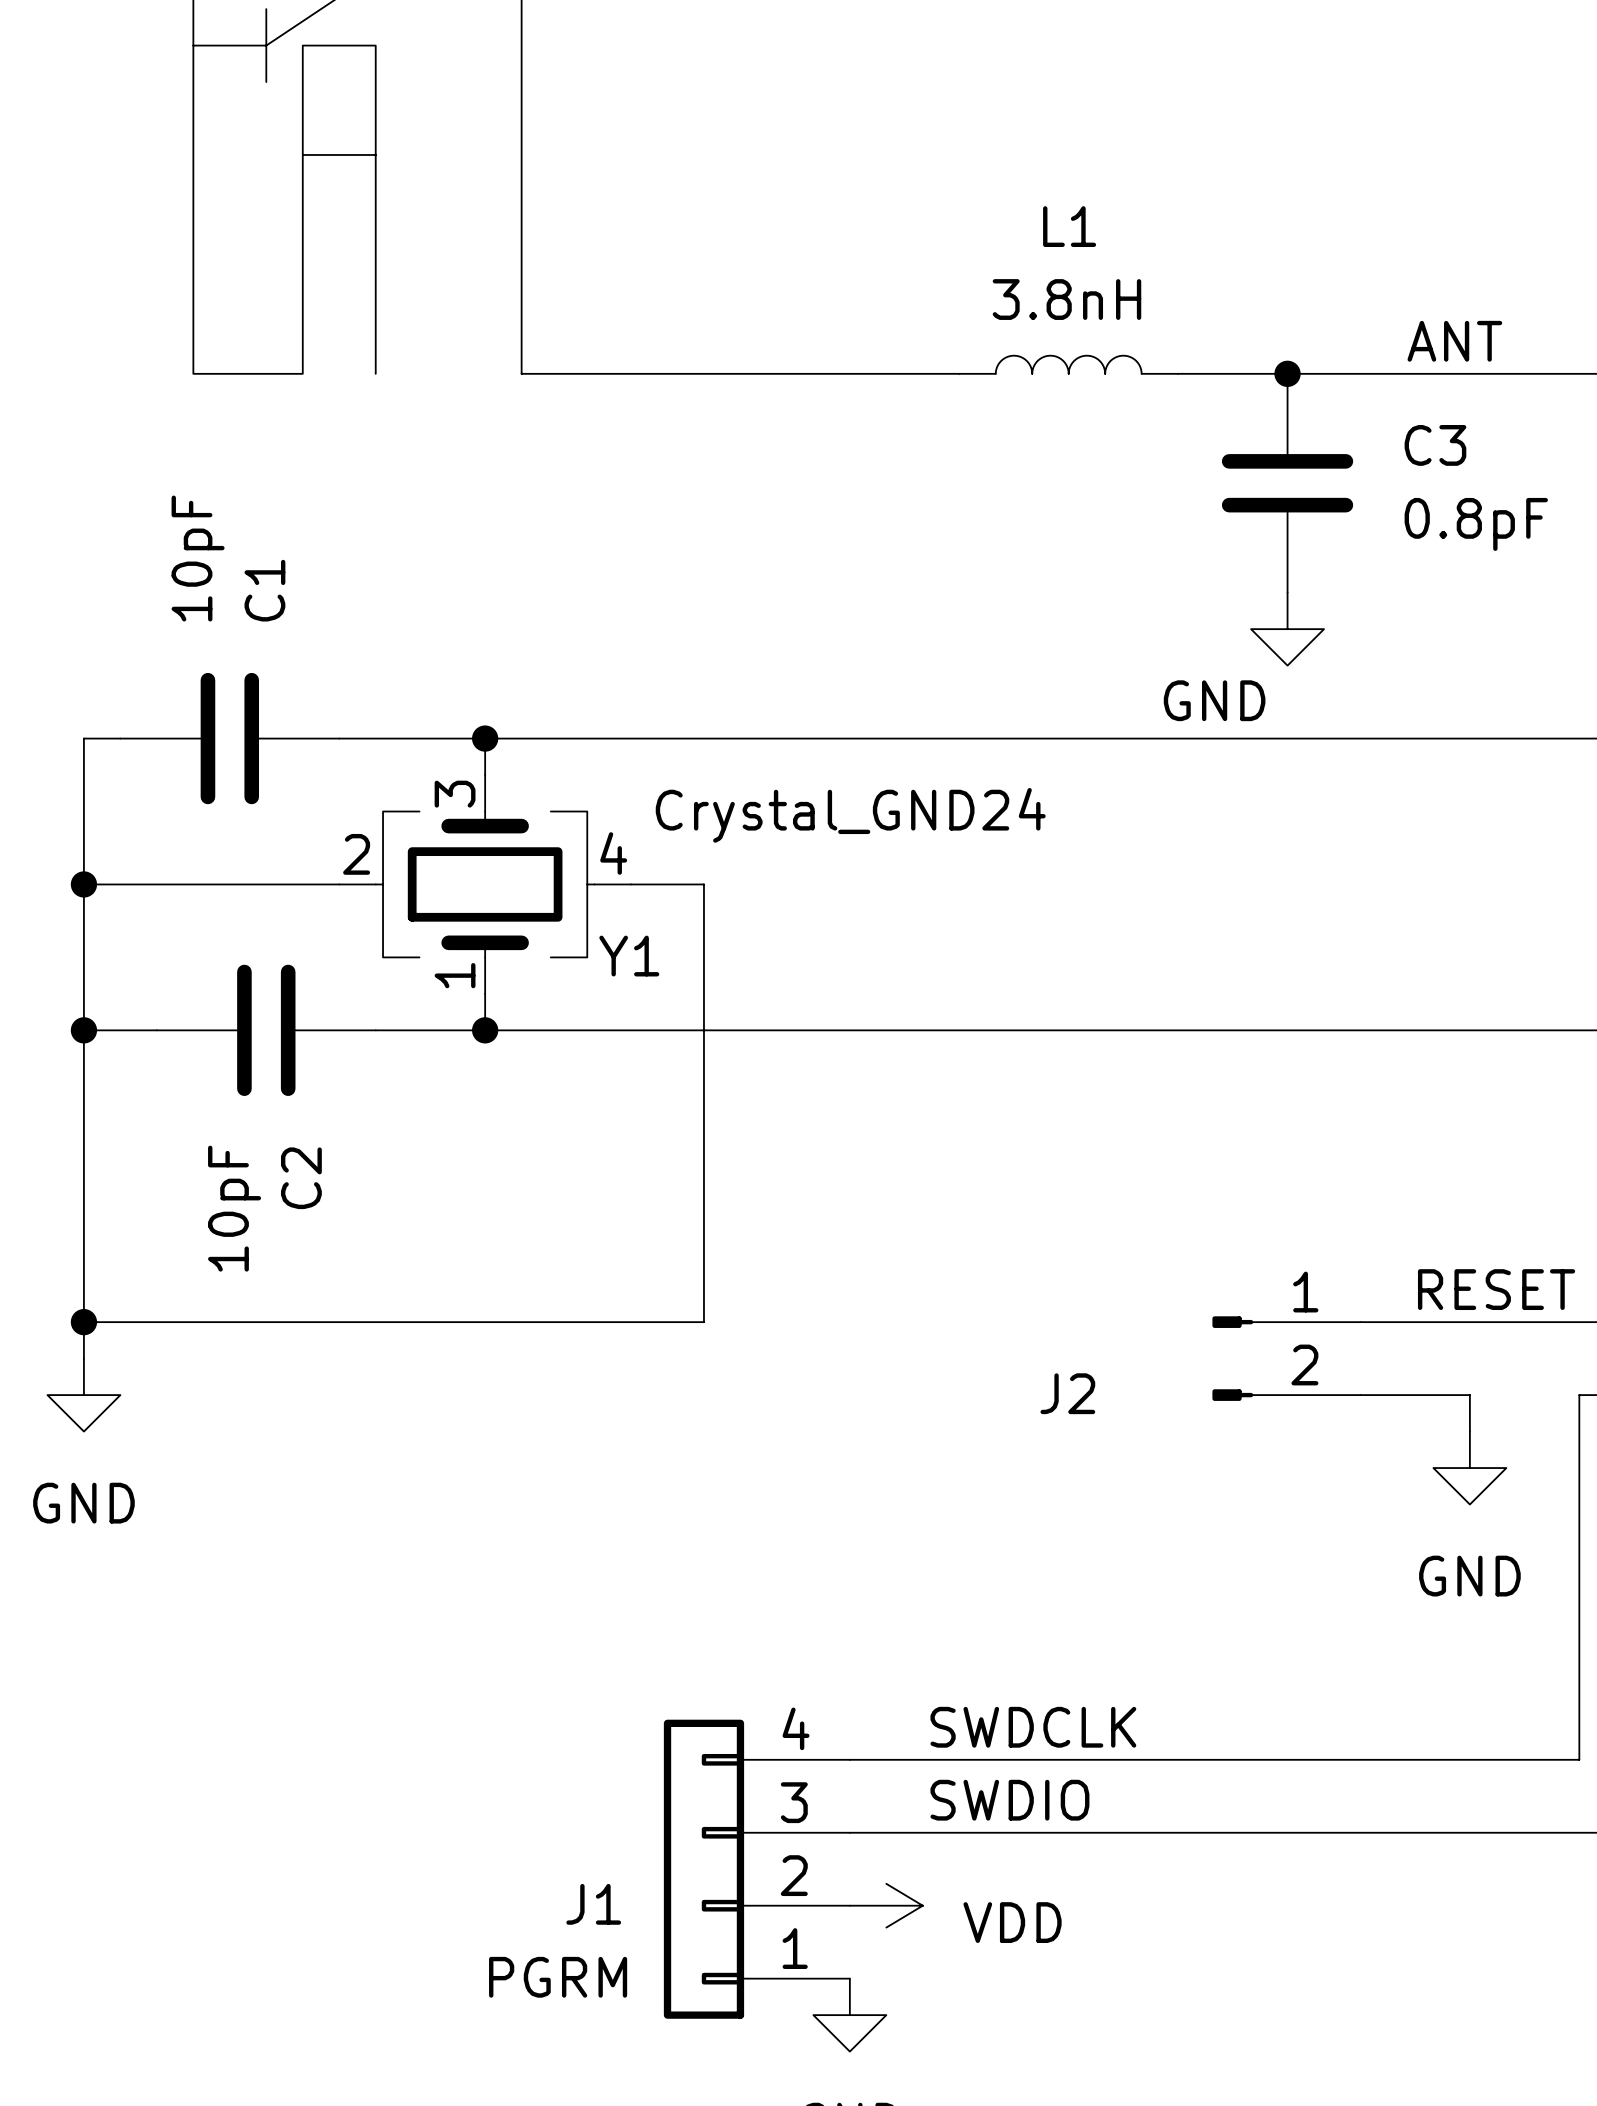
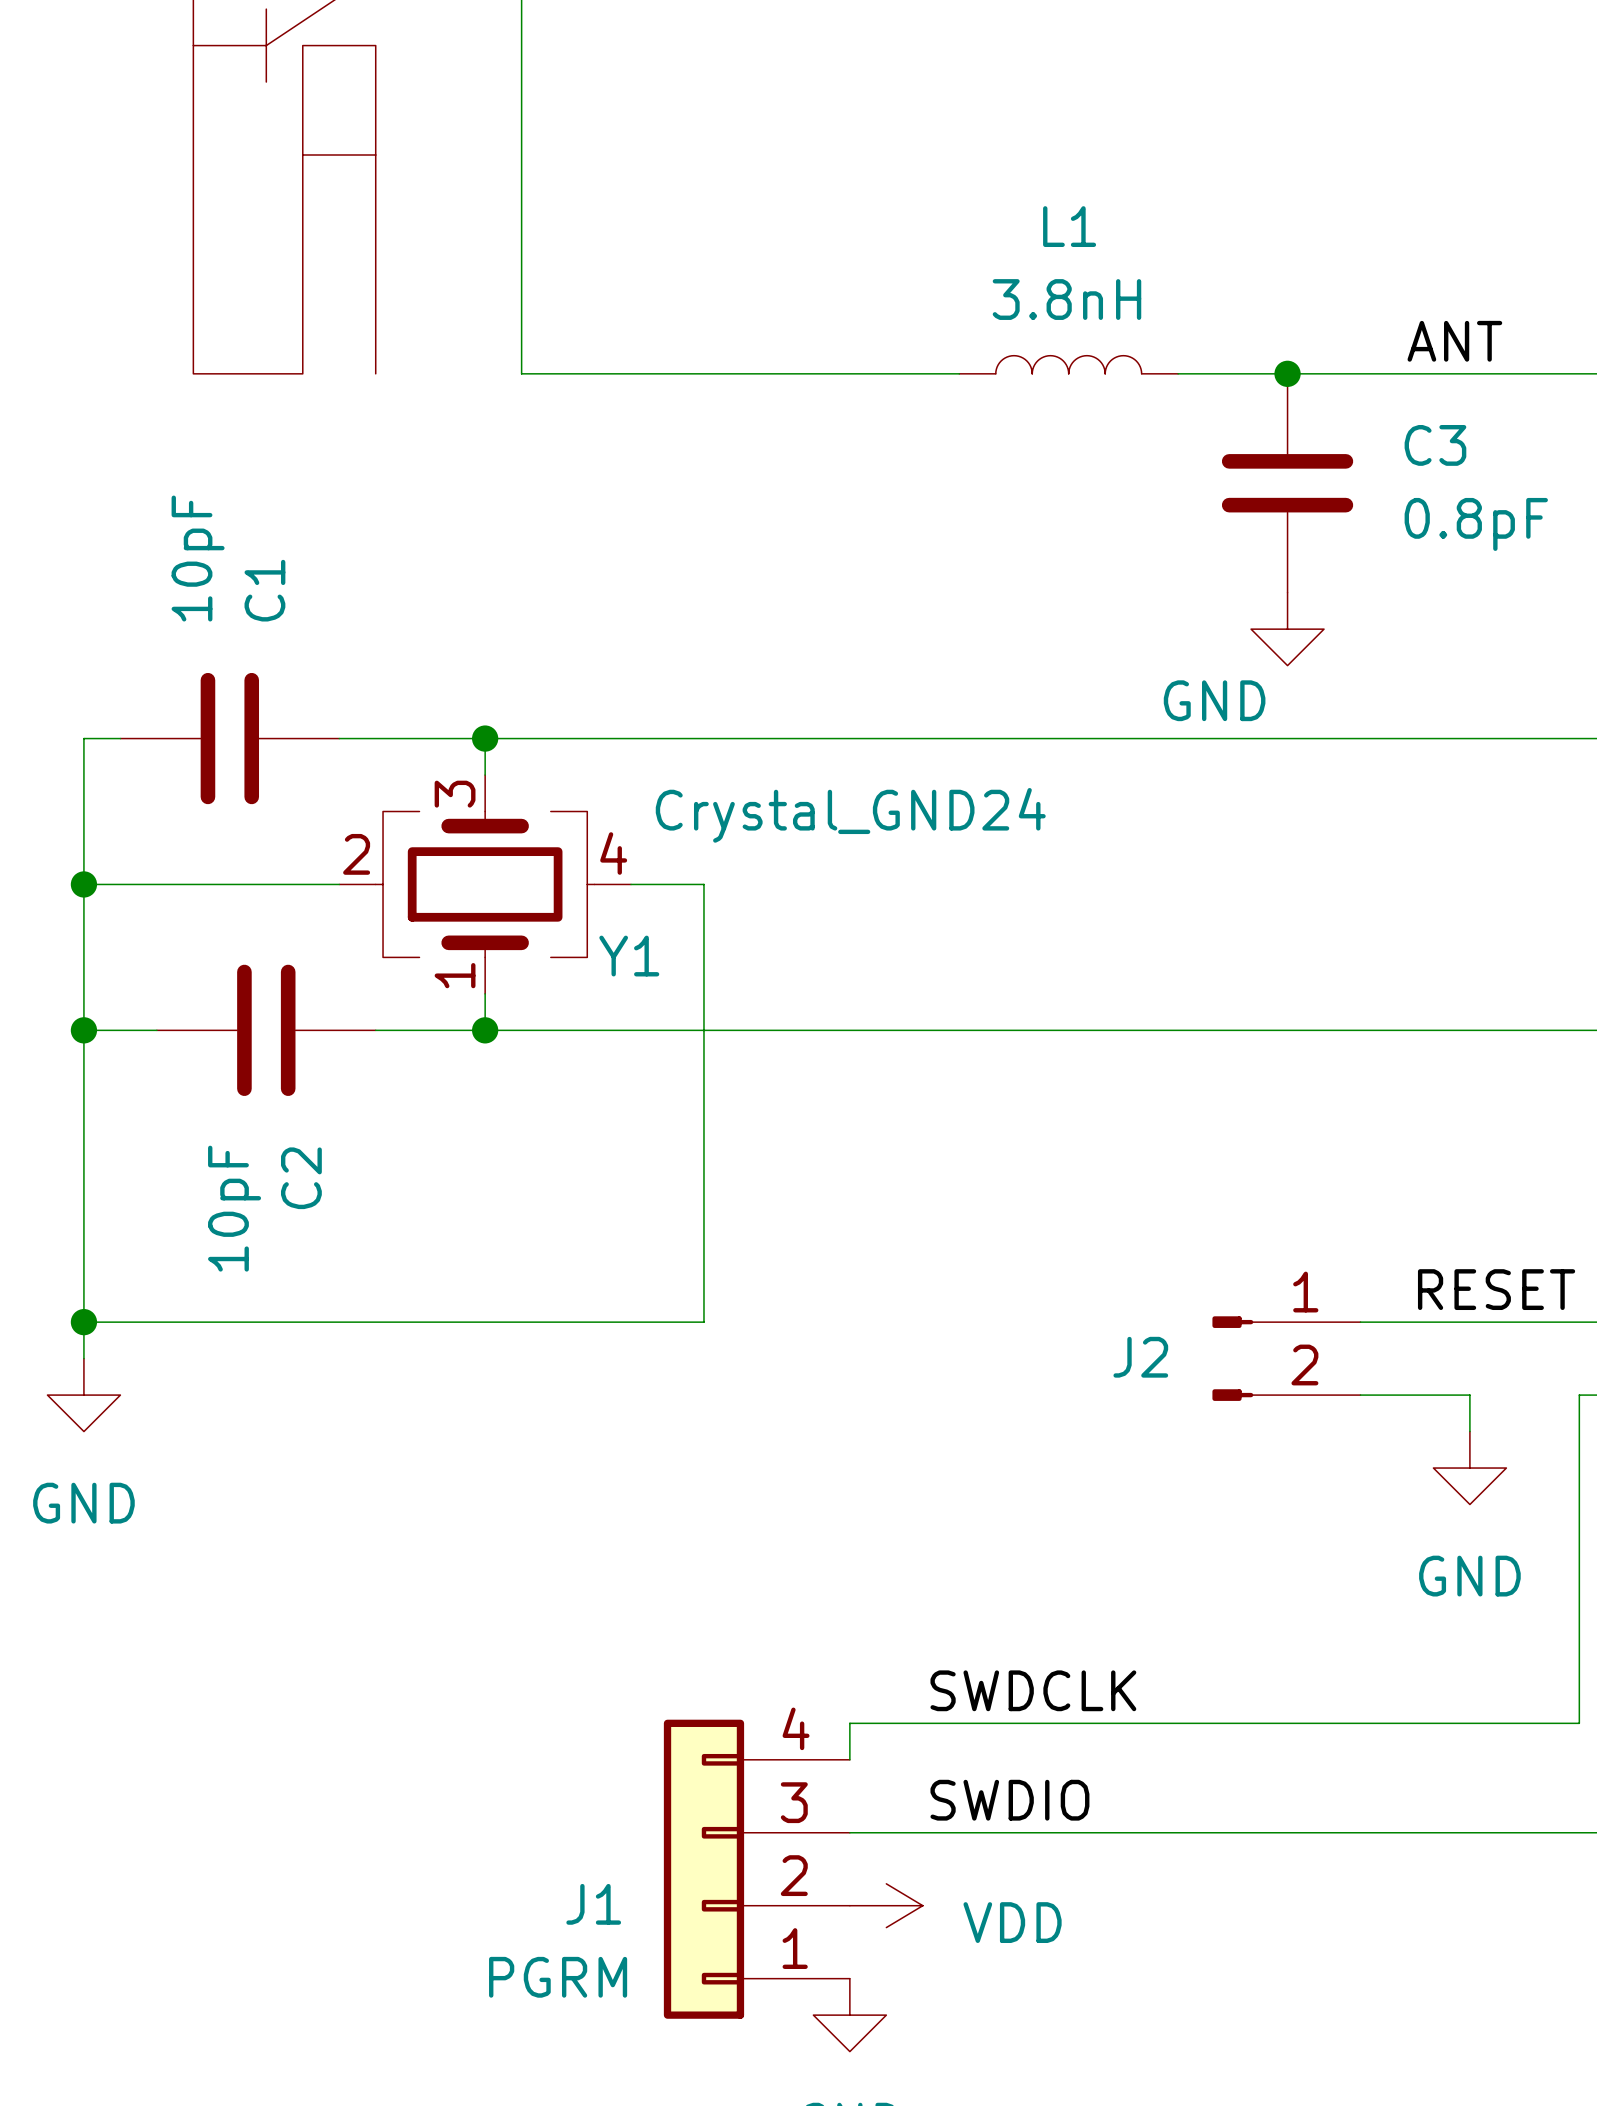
J2 name position: J2 (1067, 1393) -> J2 (1140, 1357)
wire: (1579, 1723) (1579, 1759) (849, 1759) -> (1579, 1723) (849, 1723) (849, 1759)
label position: SWDCLK (1033, 1727) -> SWDCLK (1033, 1690)

